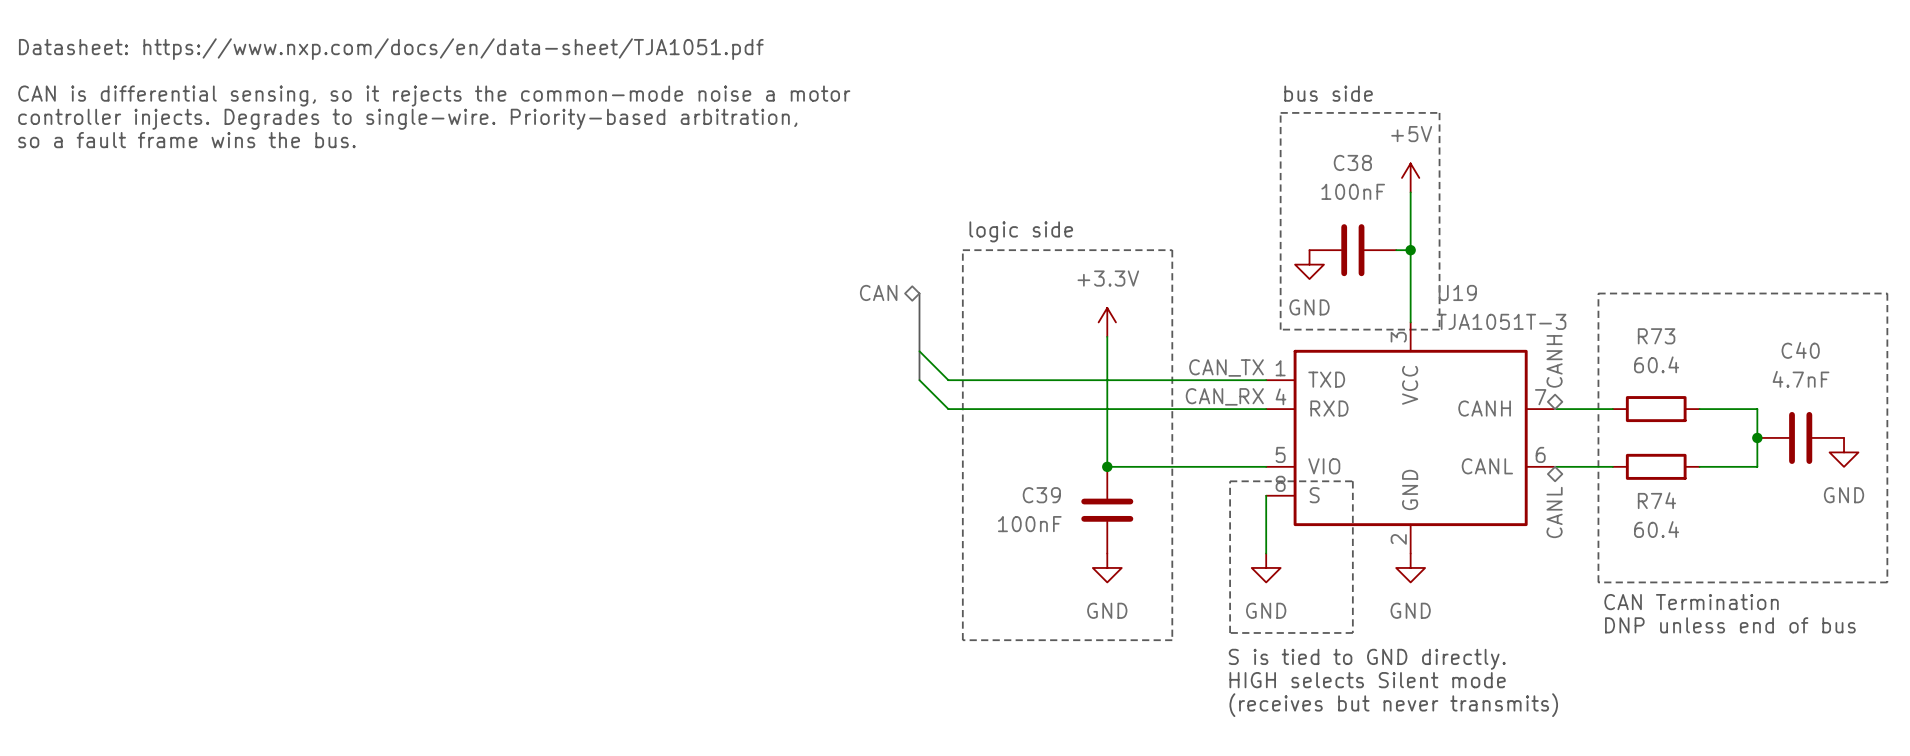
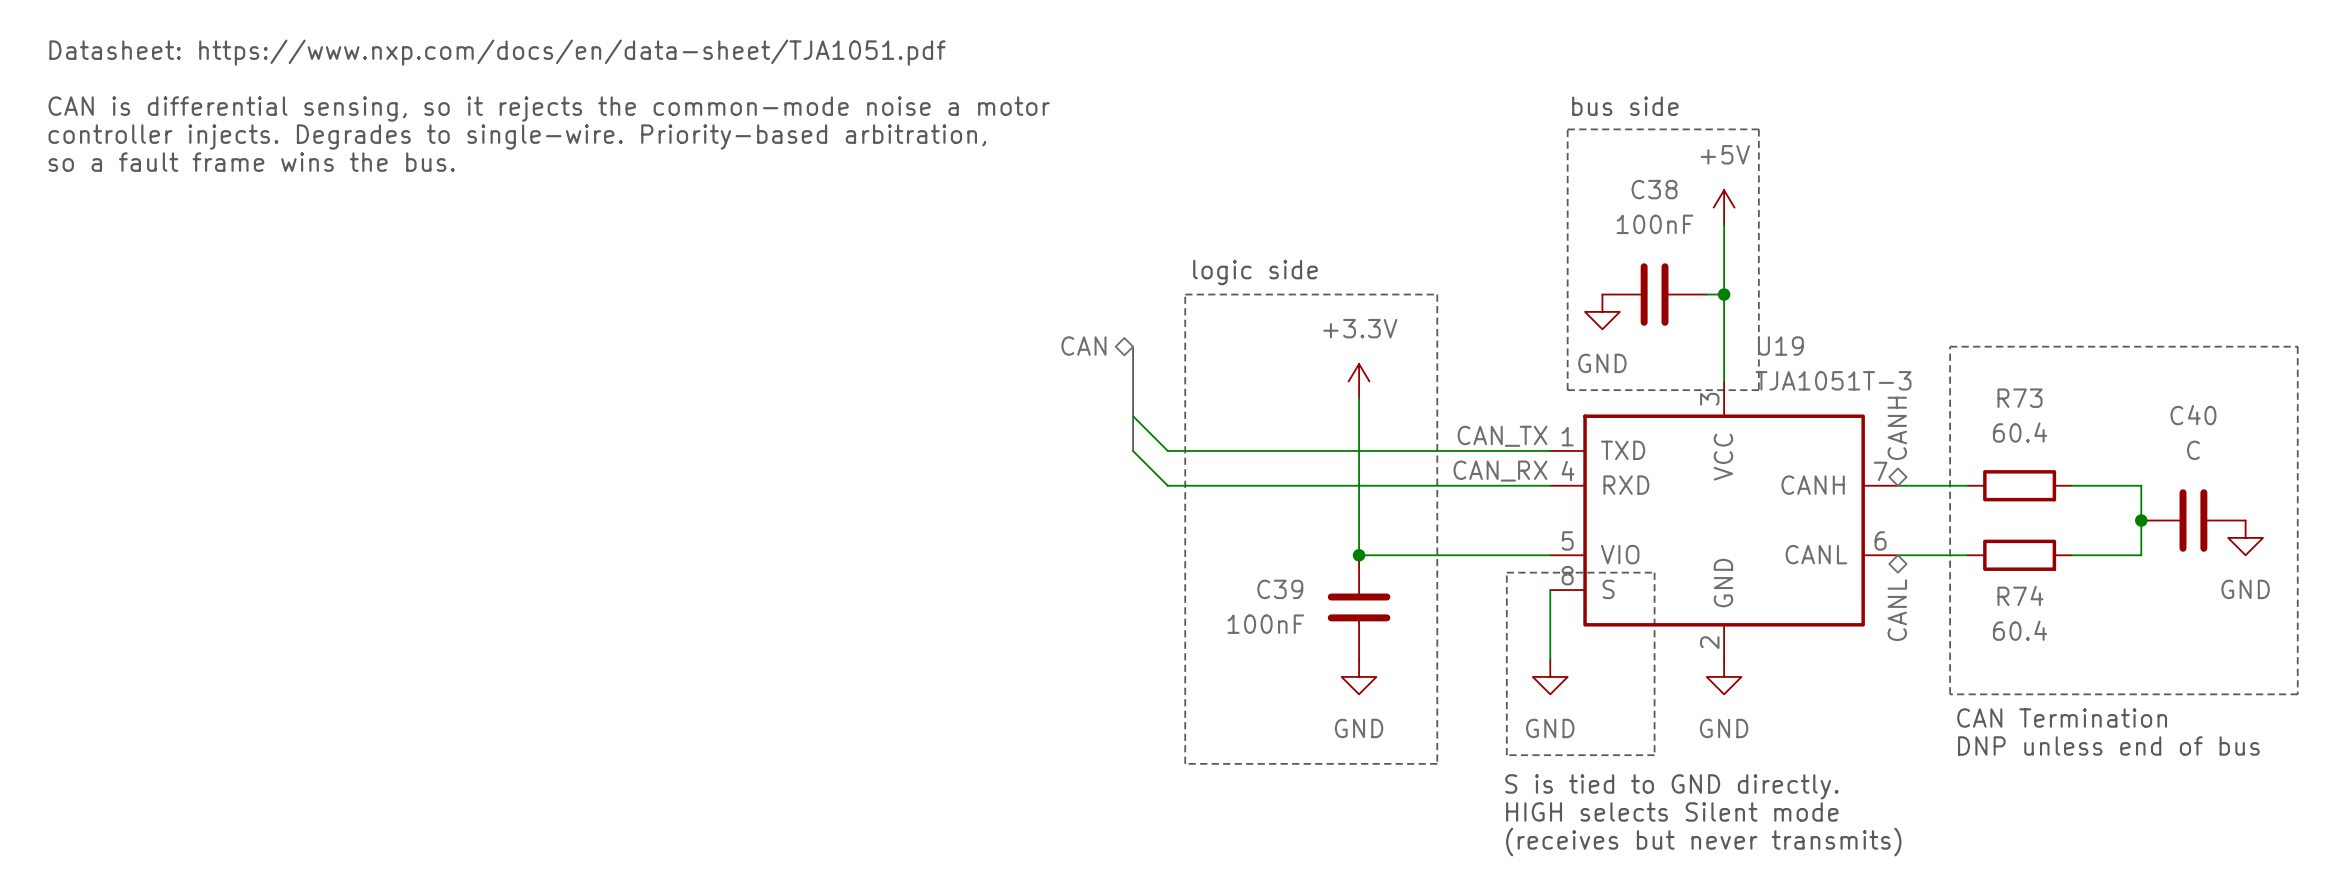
C40 value: 4.7nF (1801, 379) -> C (2193, 450)

